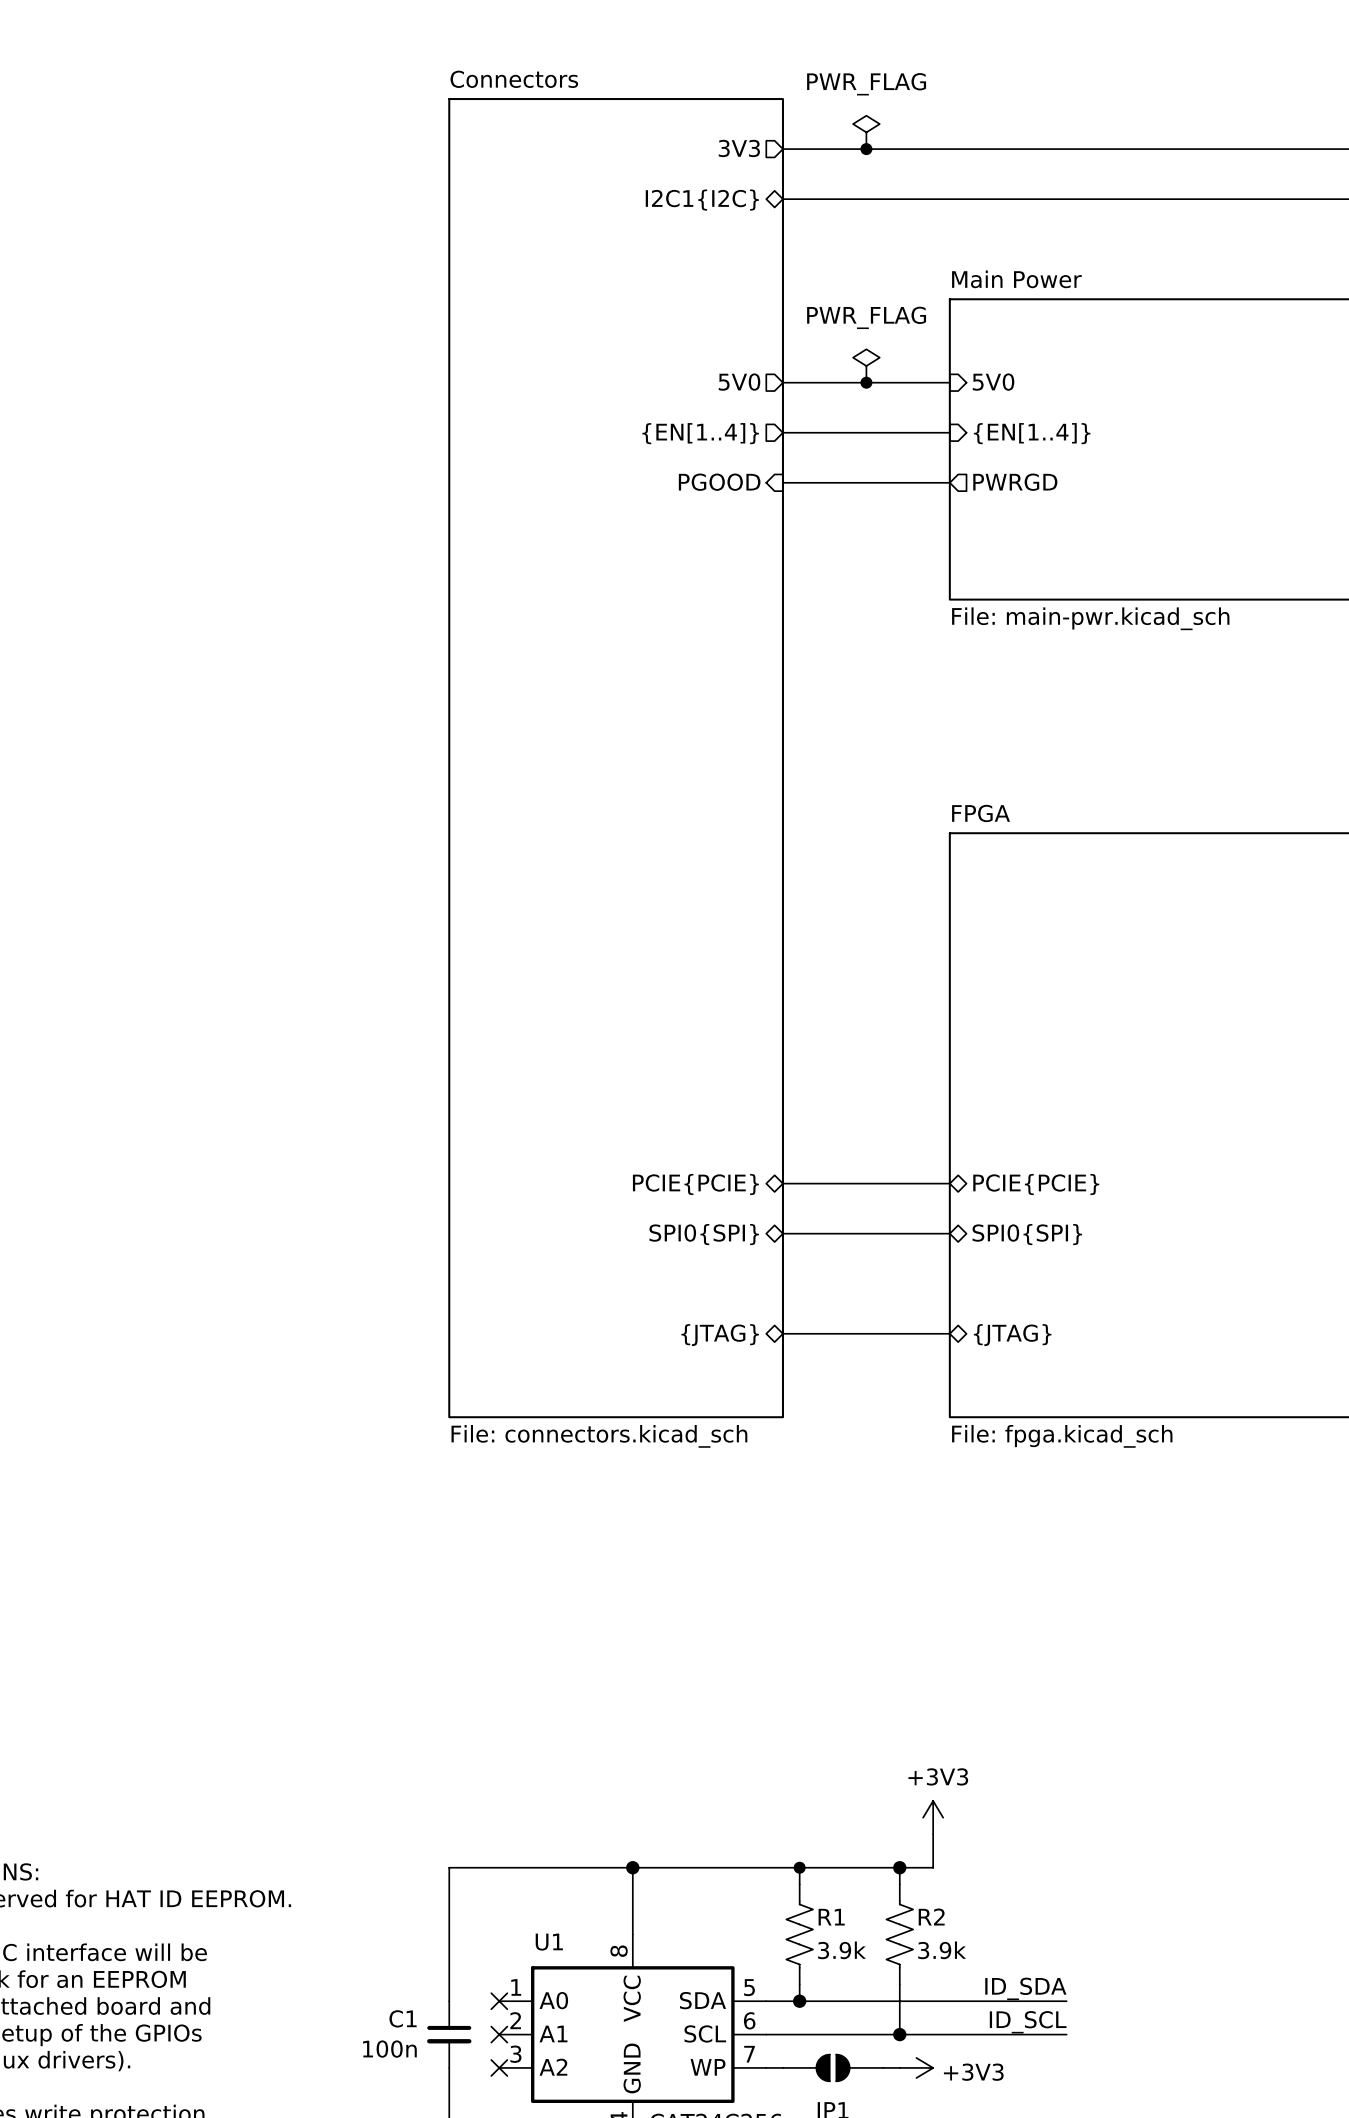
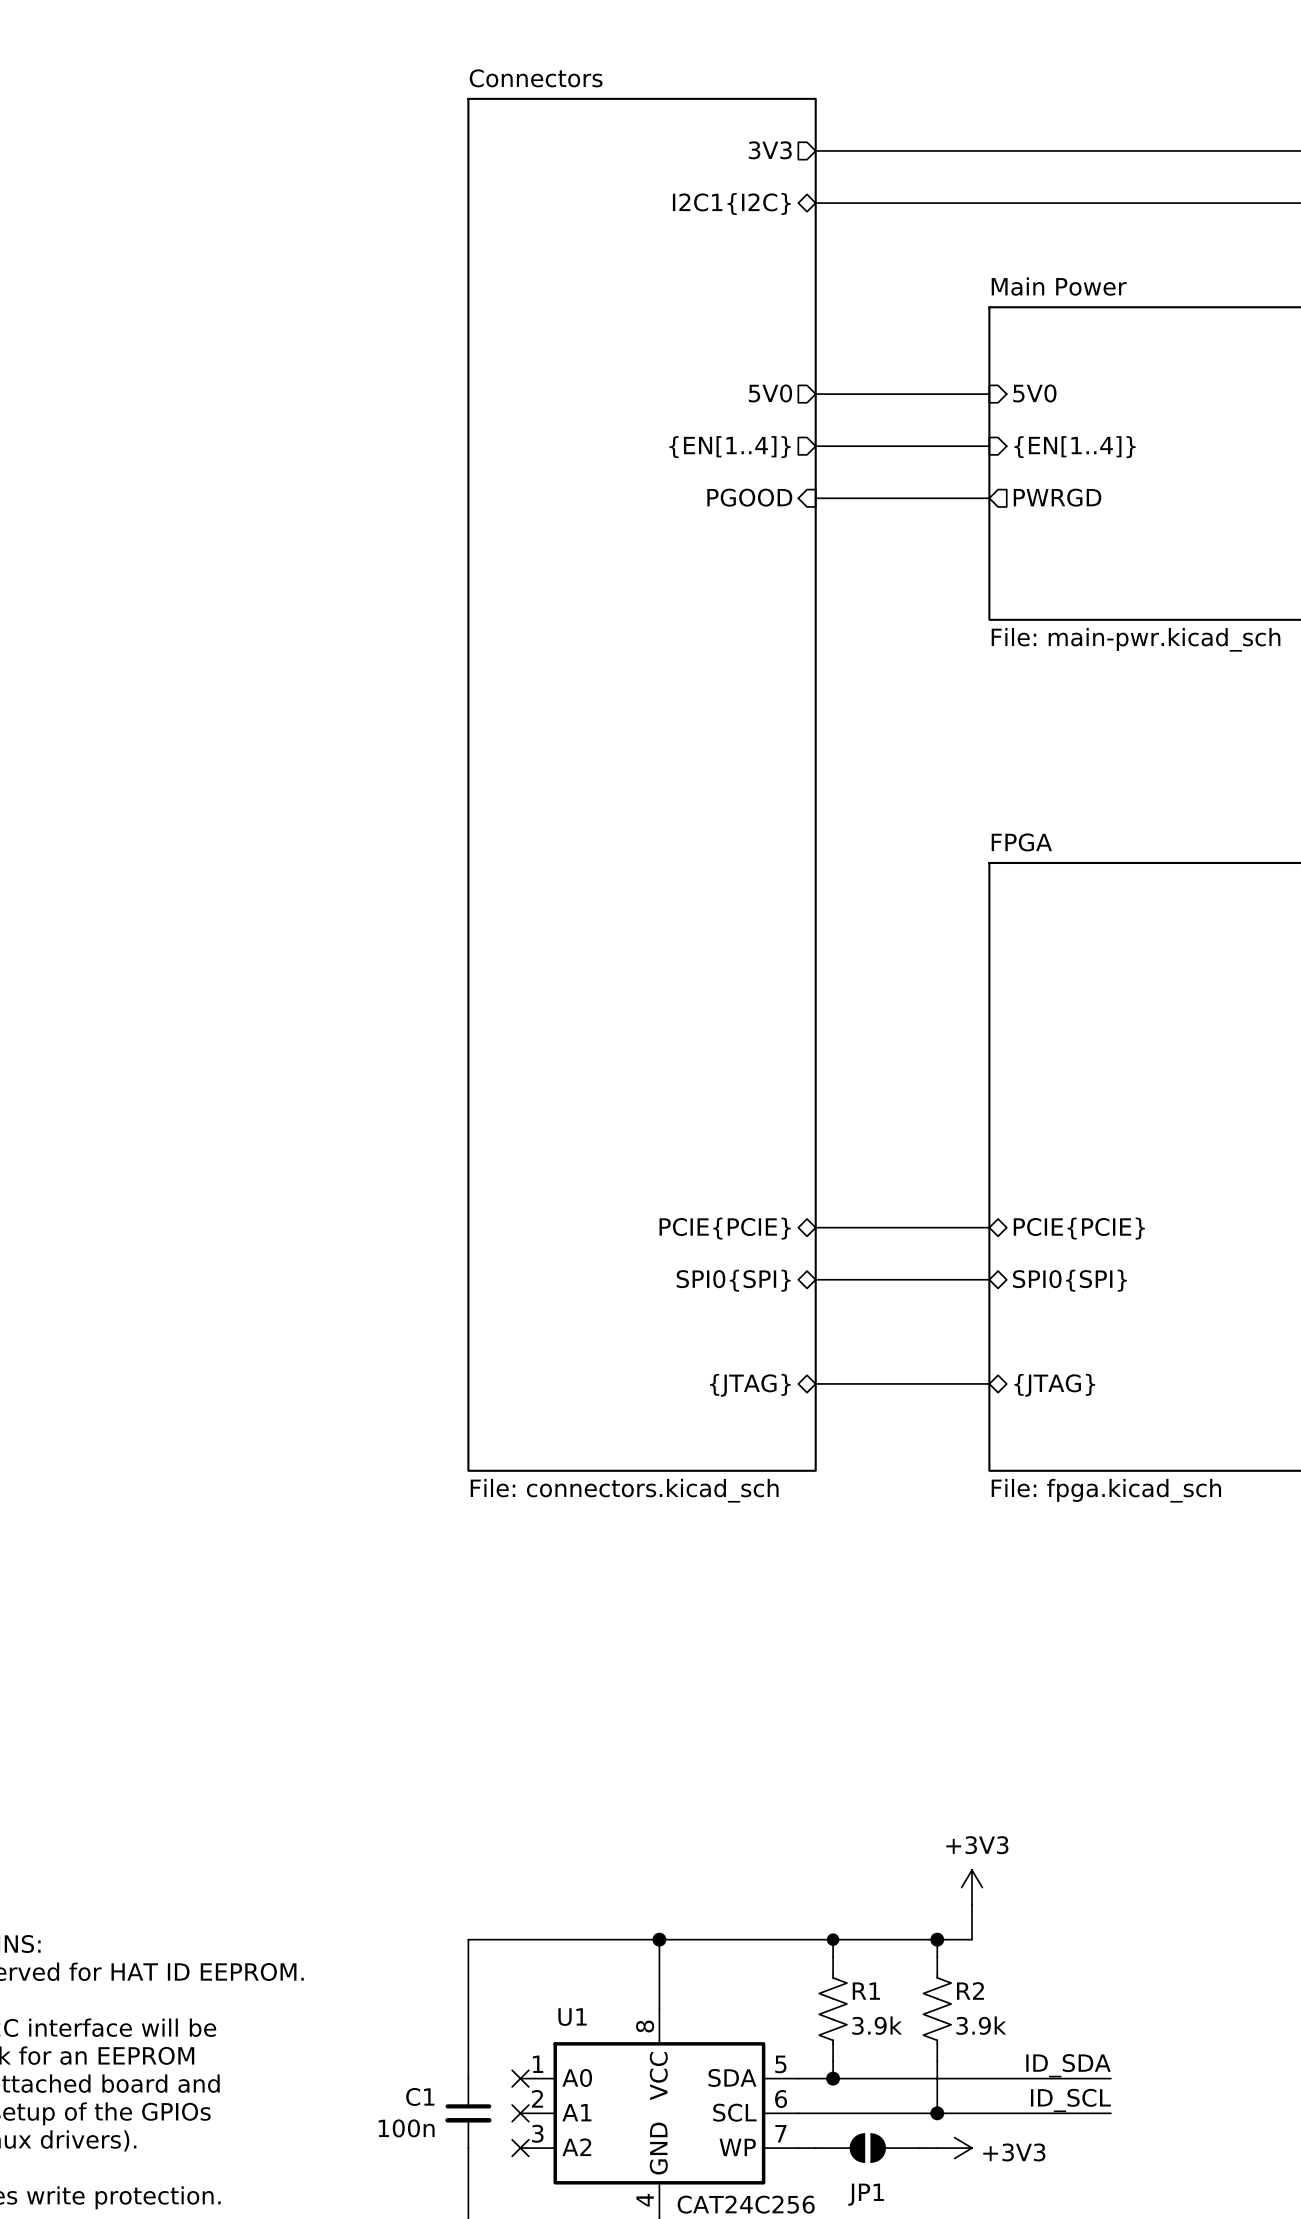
power symbol: PWR_FLAG (866, 132) -> none
junction: (866, 149) -> none
power symbol: PWR_FLAG (866, 366) -> none
junction: (866, 382) -> none

